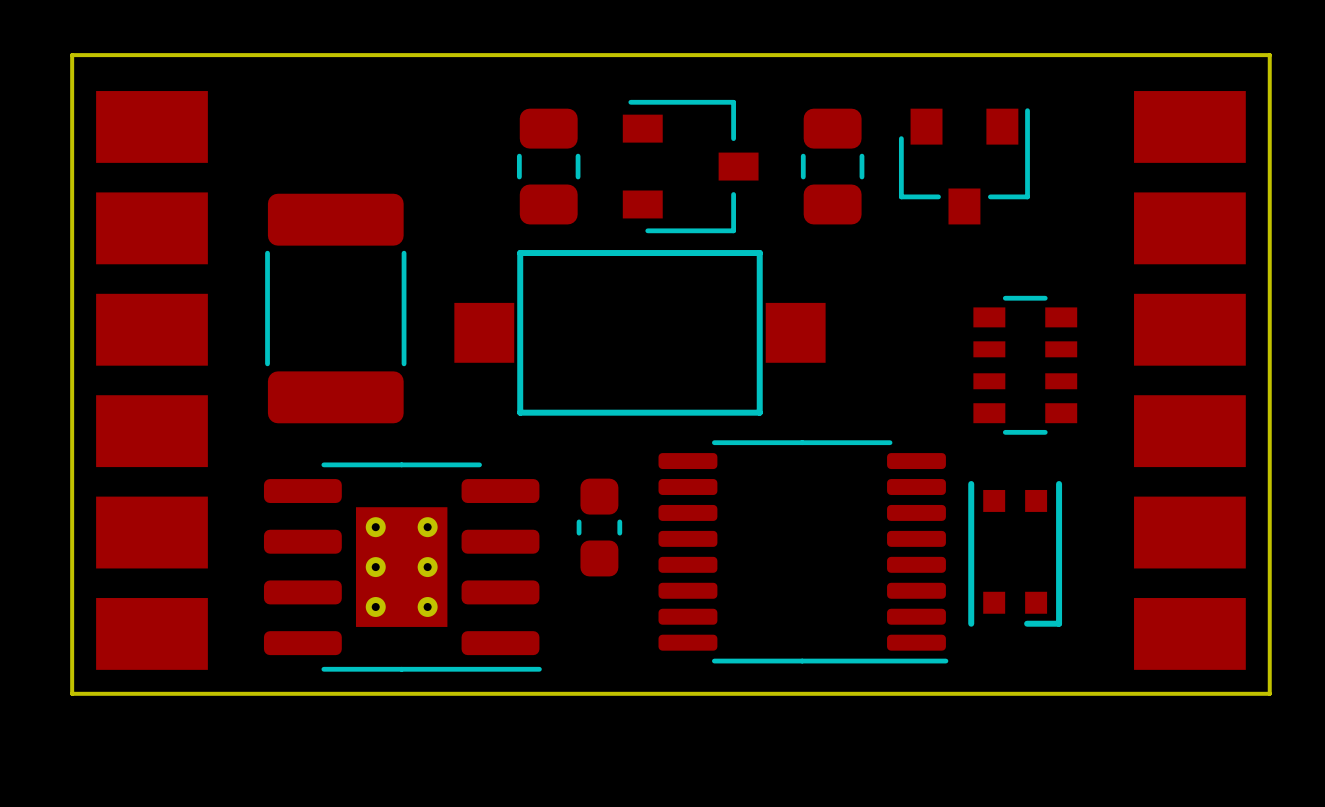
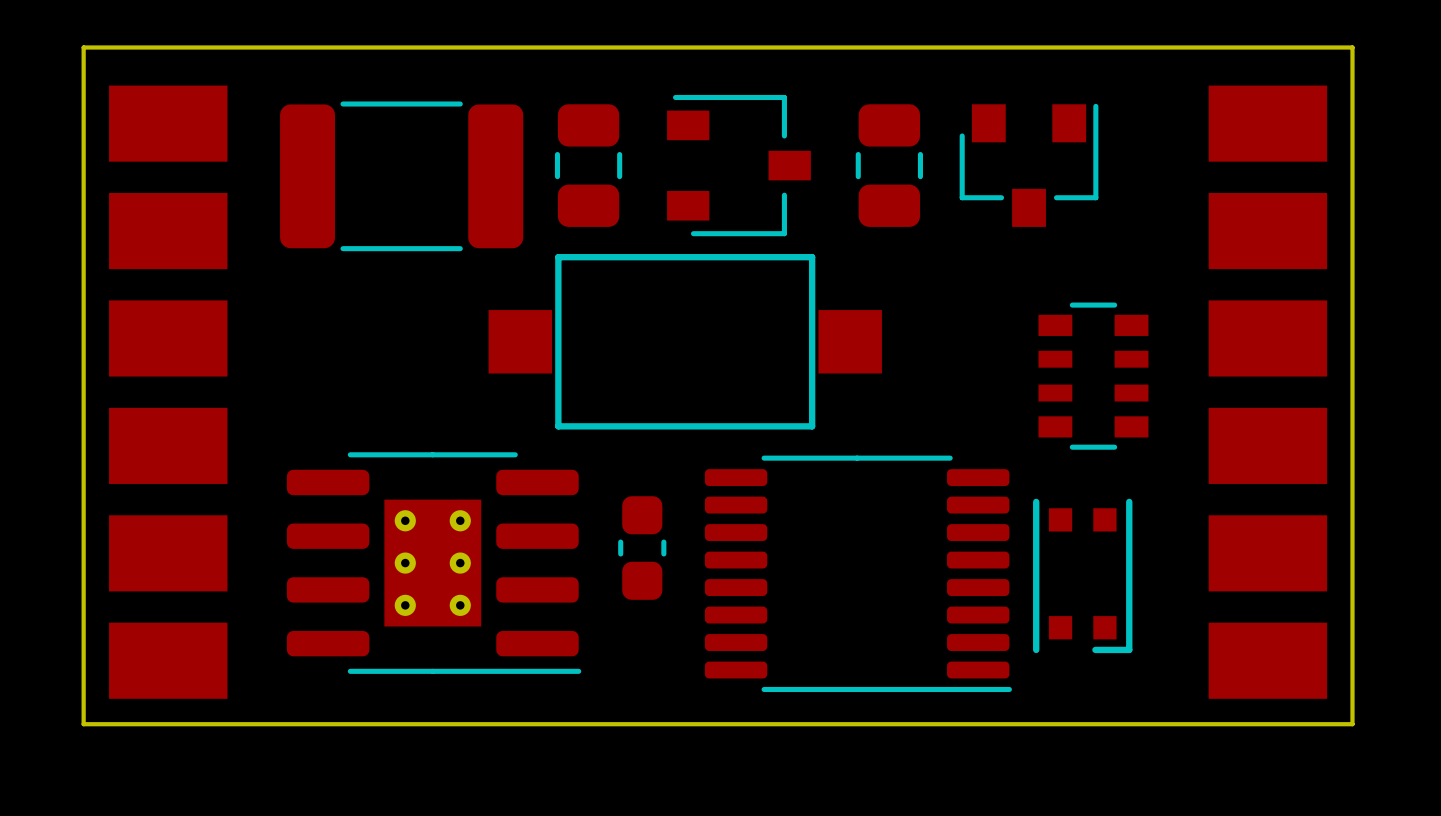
part rotation: 0° (335, 308) -> 90° clockwise (401, 176)
part position: (402, 567) -> (434, 563)

